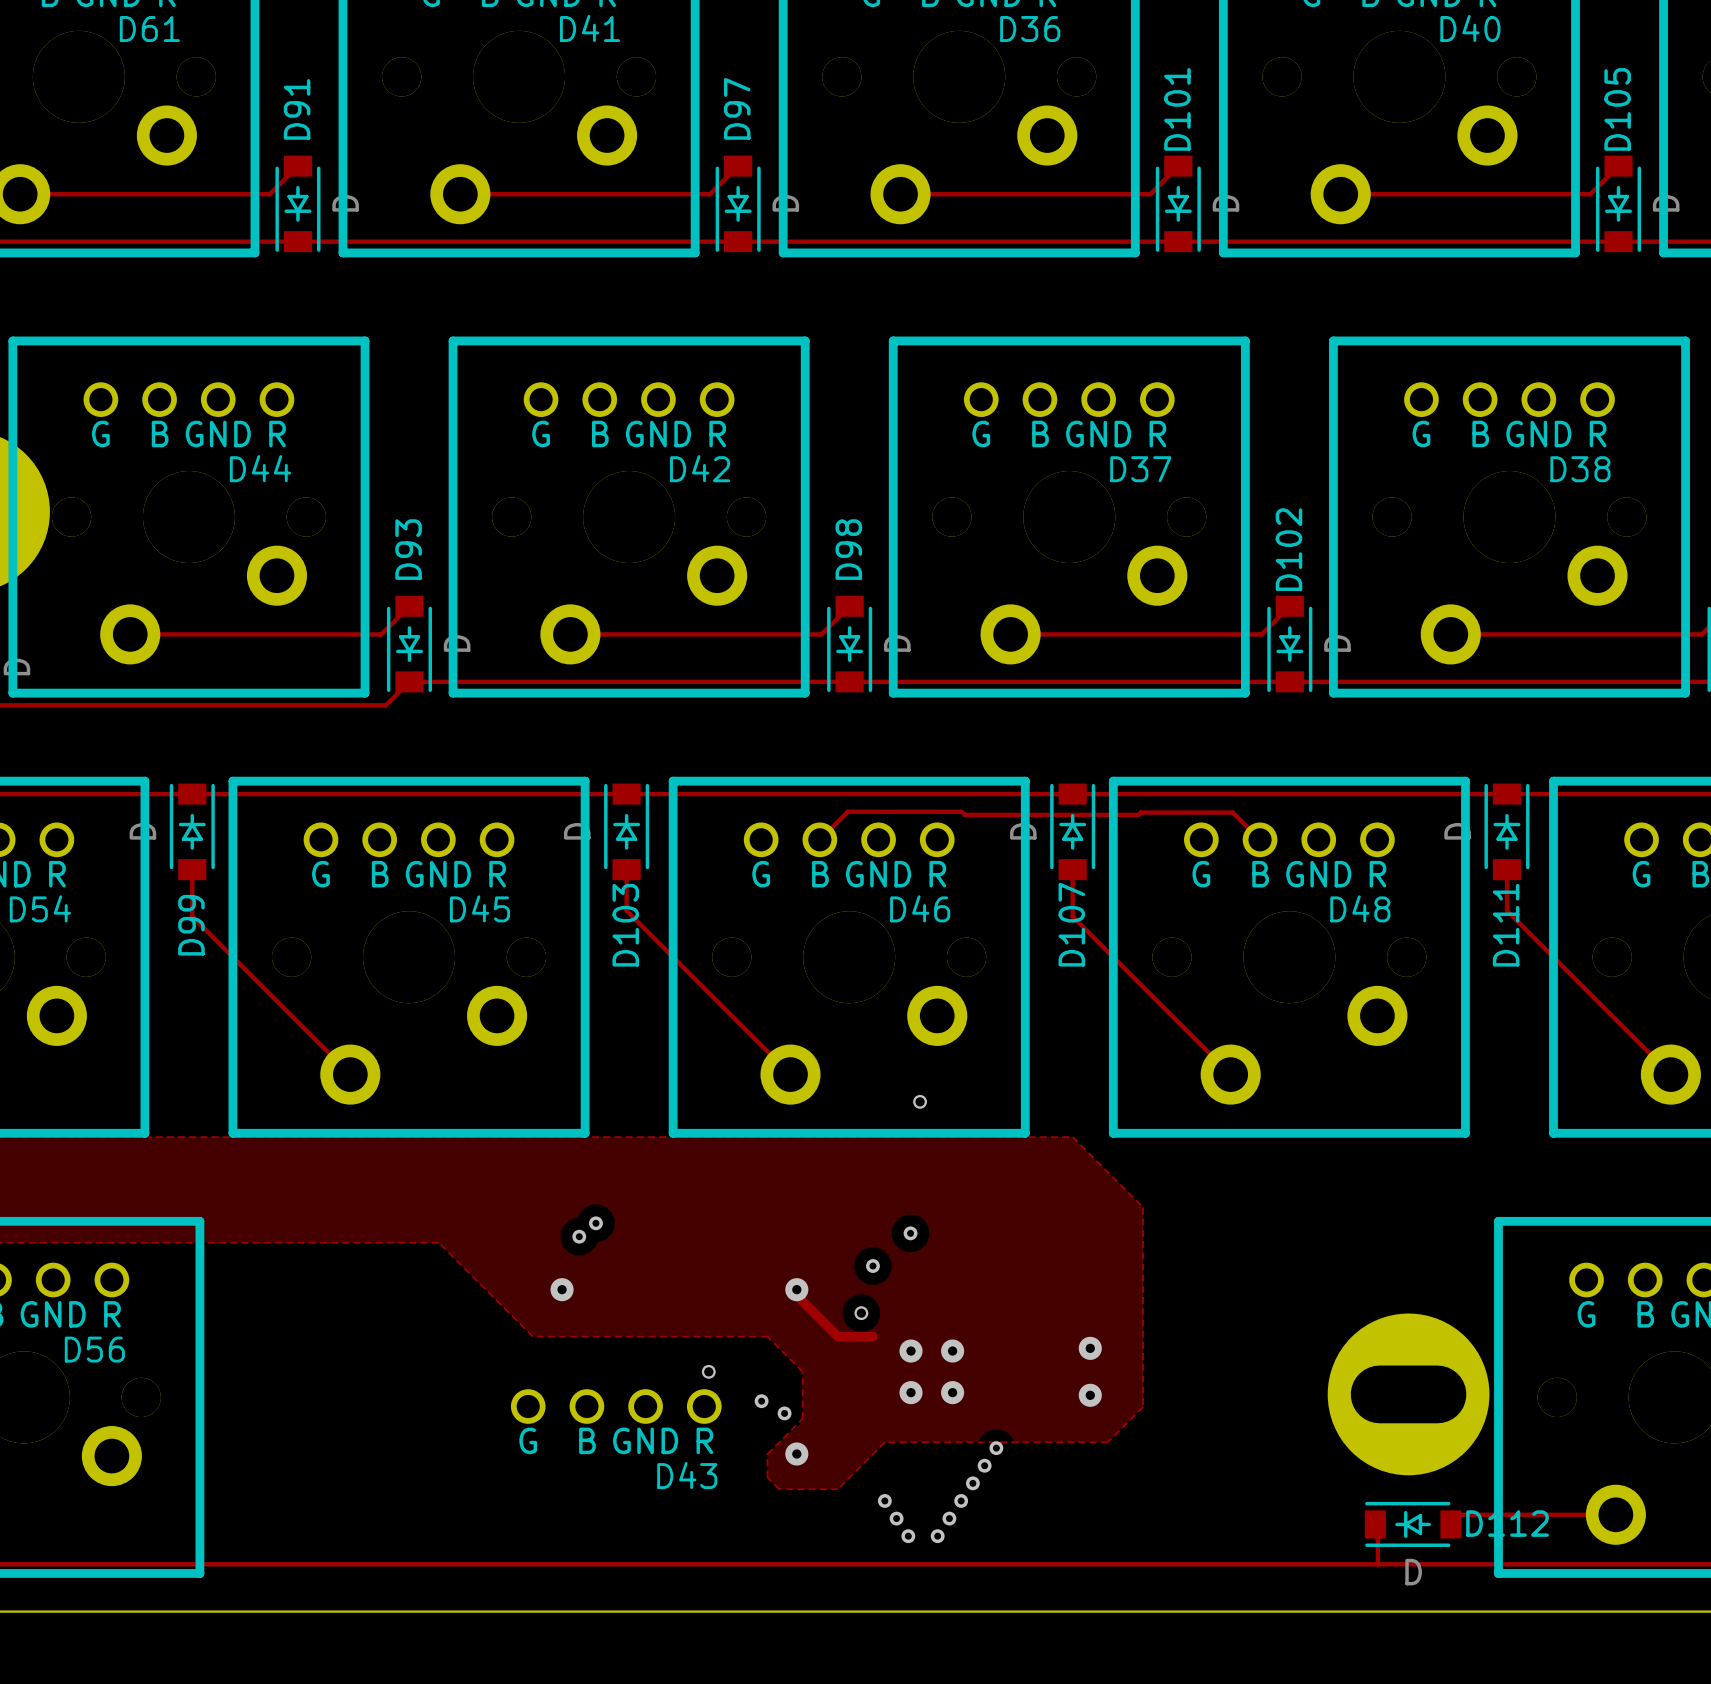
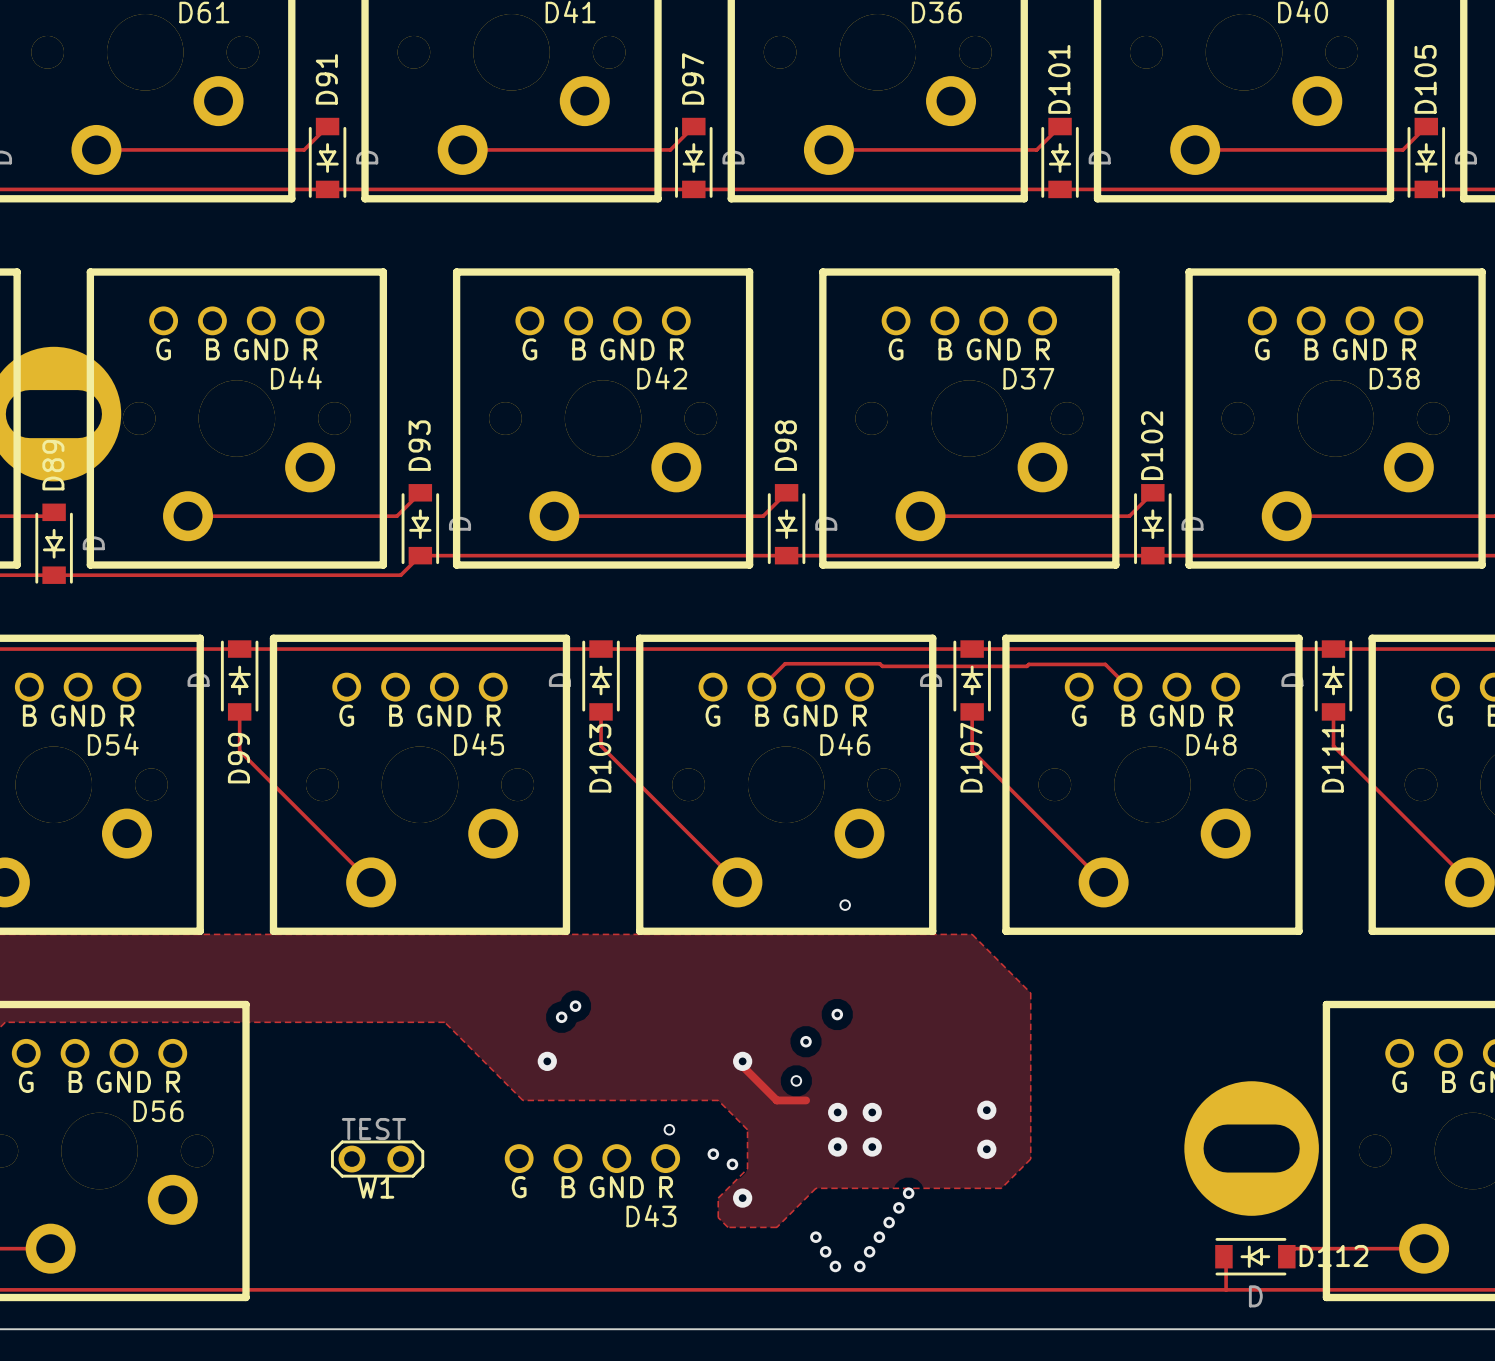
W1: none -> TEST (377, 1159)

